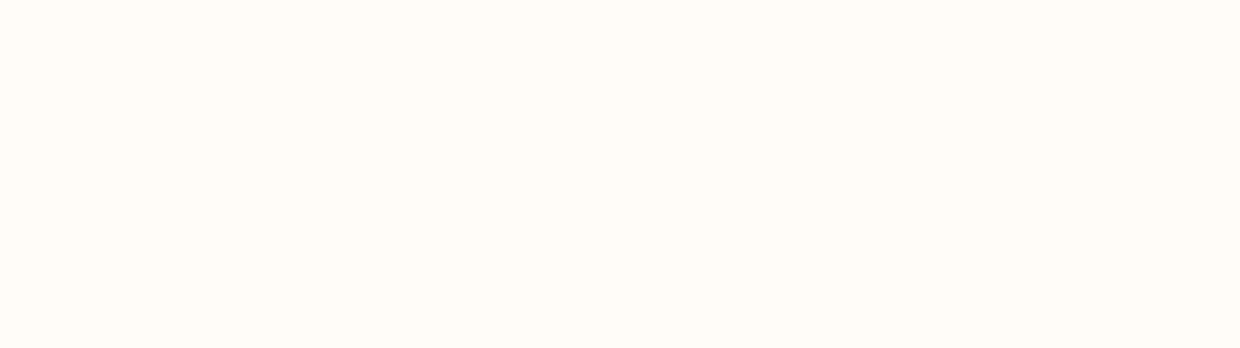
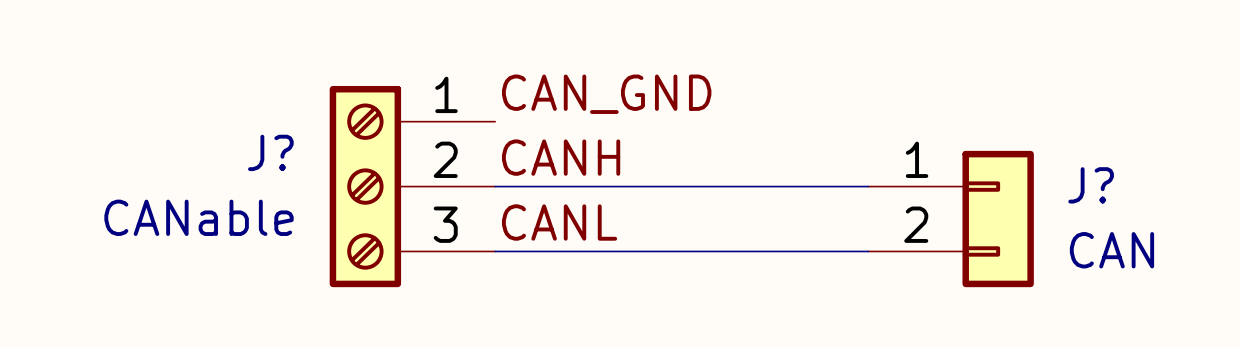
label: none -> CAN_GND (606, 94)
label: none -> CANH (561, 157)
J?: none -> CANable (412, 186)
wire: none -> (495, 186) (868, 186)
J?: none -> CAN (951, 219)
label: none -> CANL (559, 222)
wire: none -> (495, 251) (868, 251)

